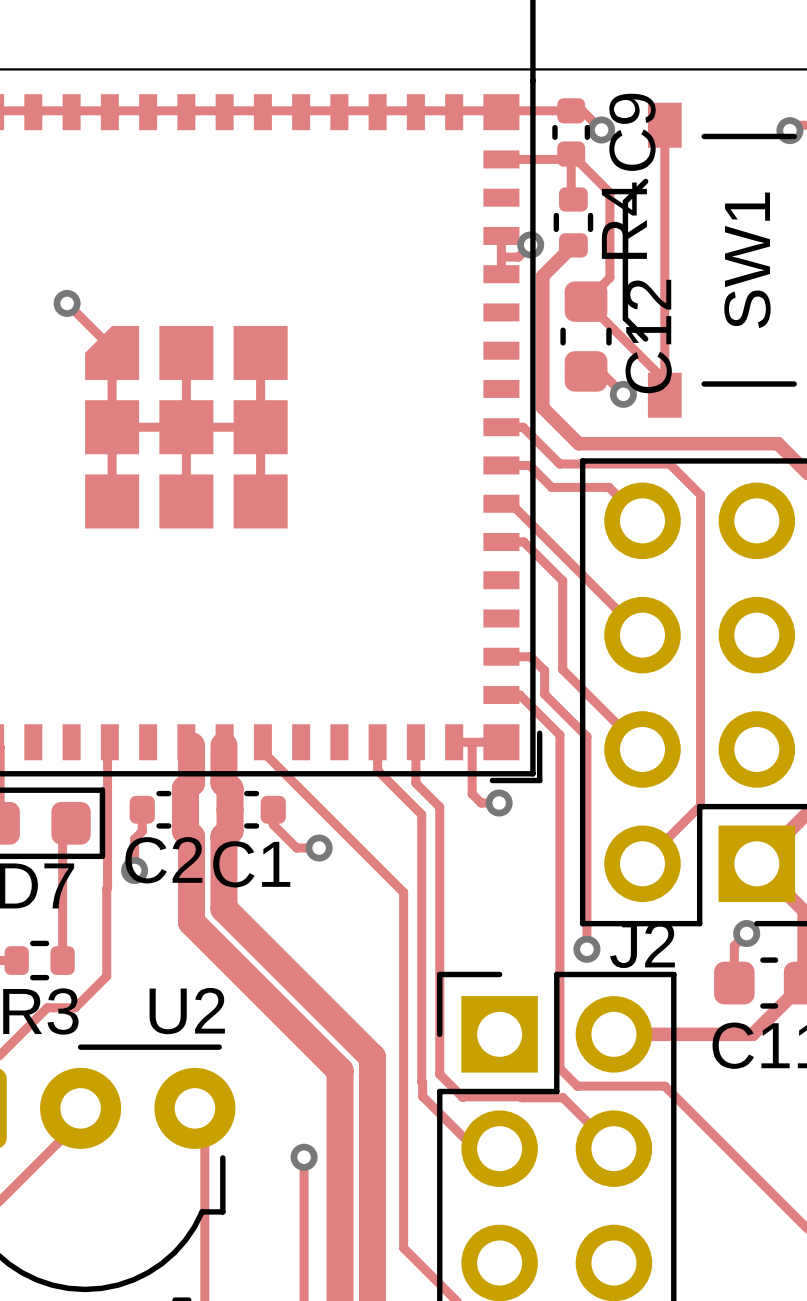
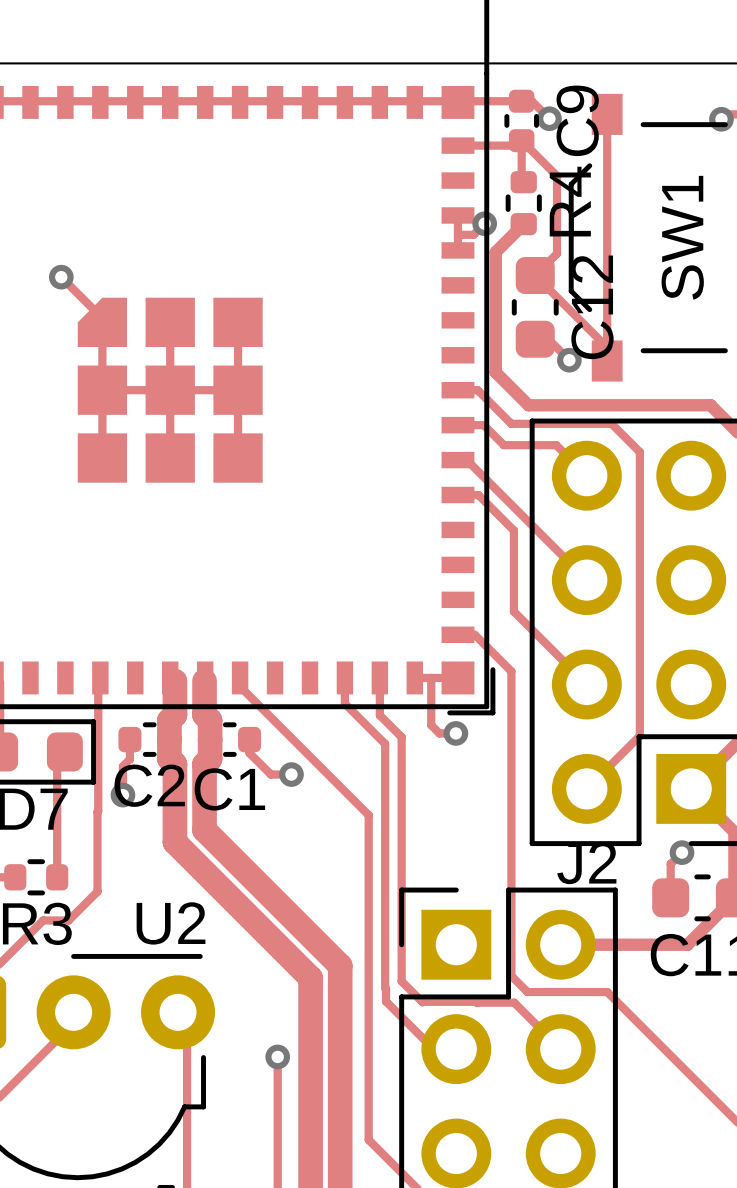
track: (501, 656) (530, 656) (544, 670) (544, 694) (586, 736) (586, 949) (589, 951) -> none
via: (586, 949) -> none

